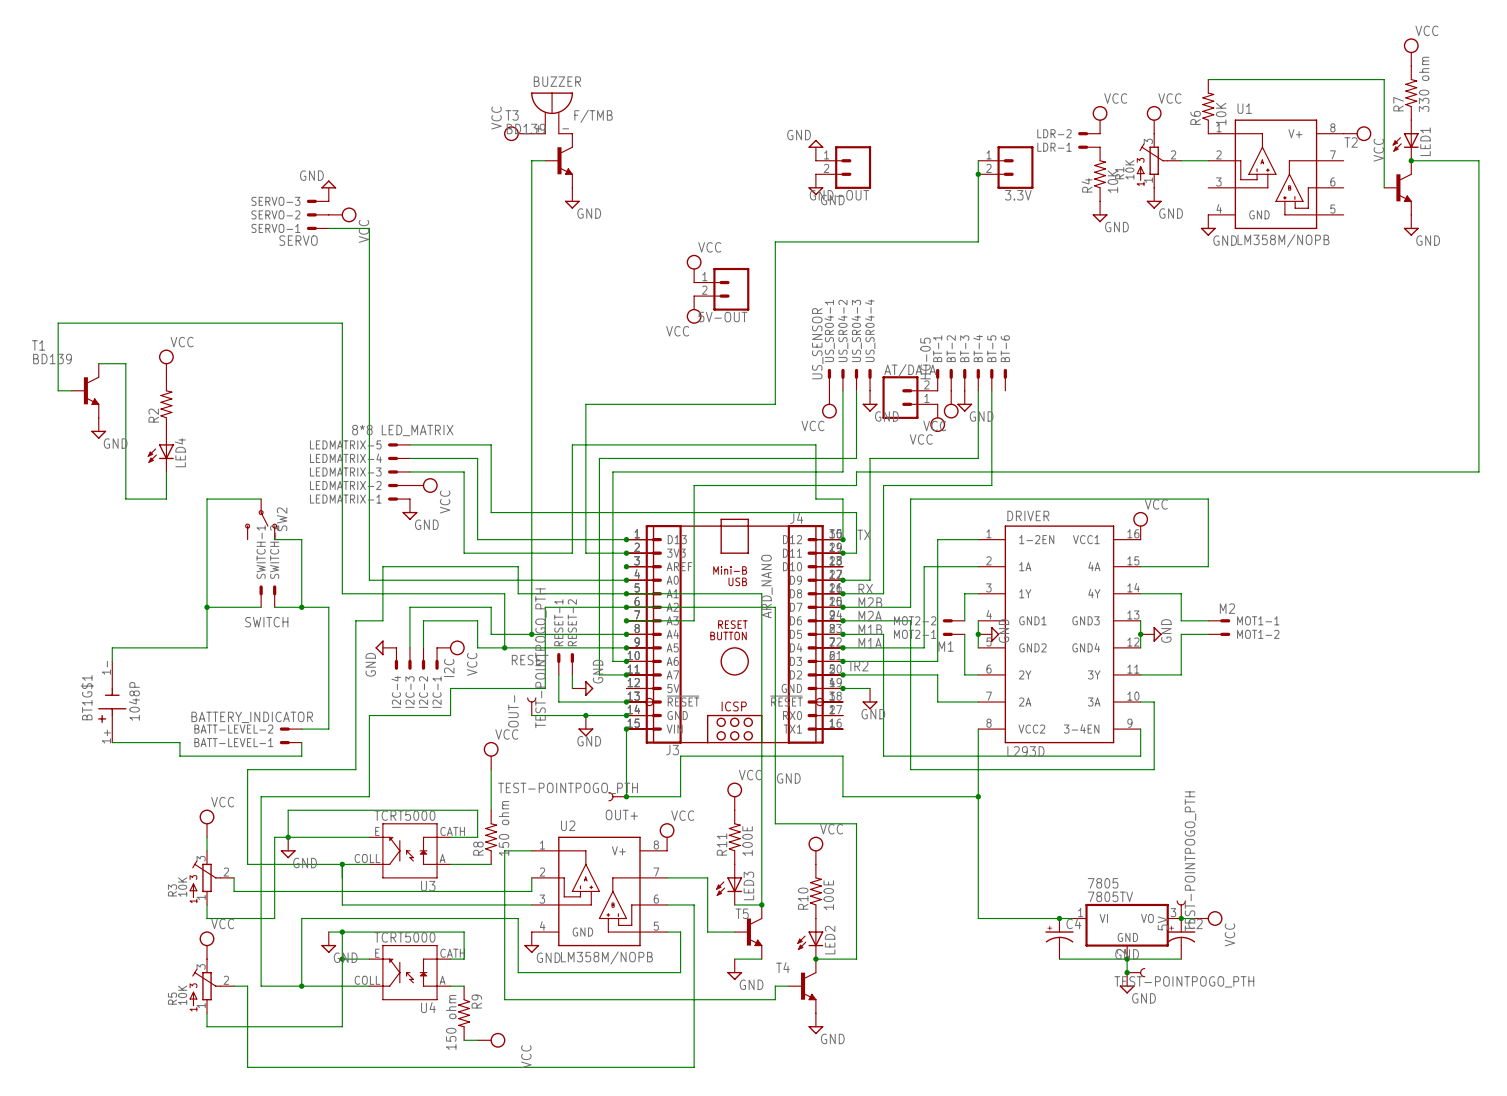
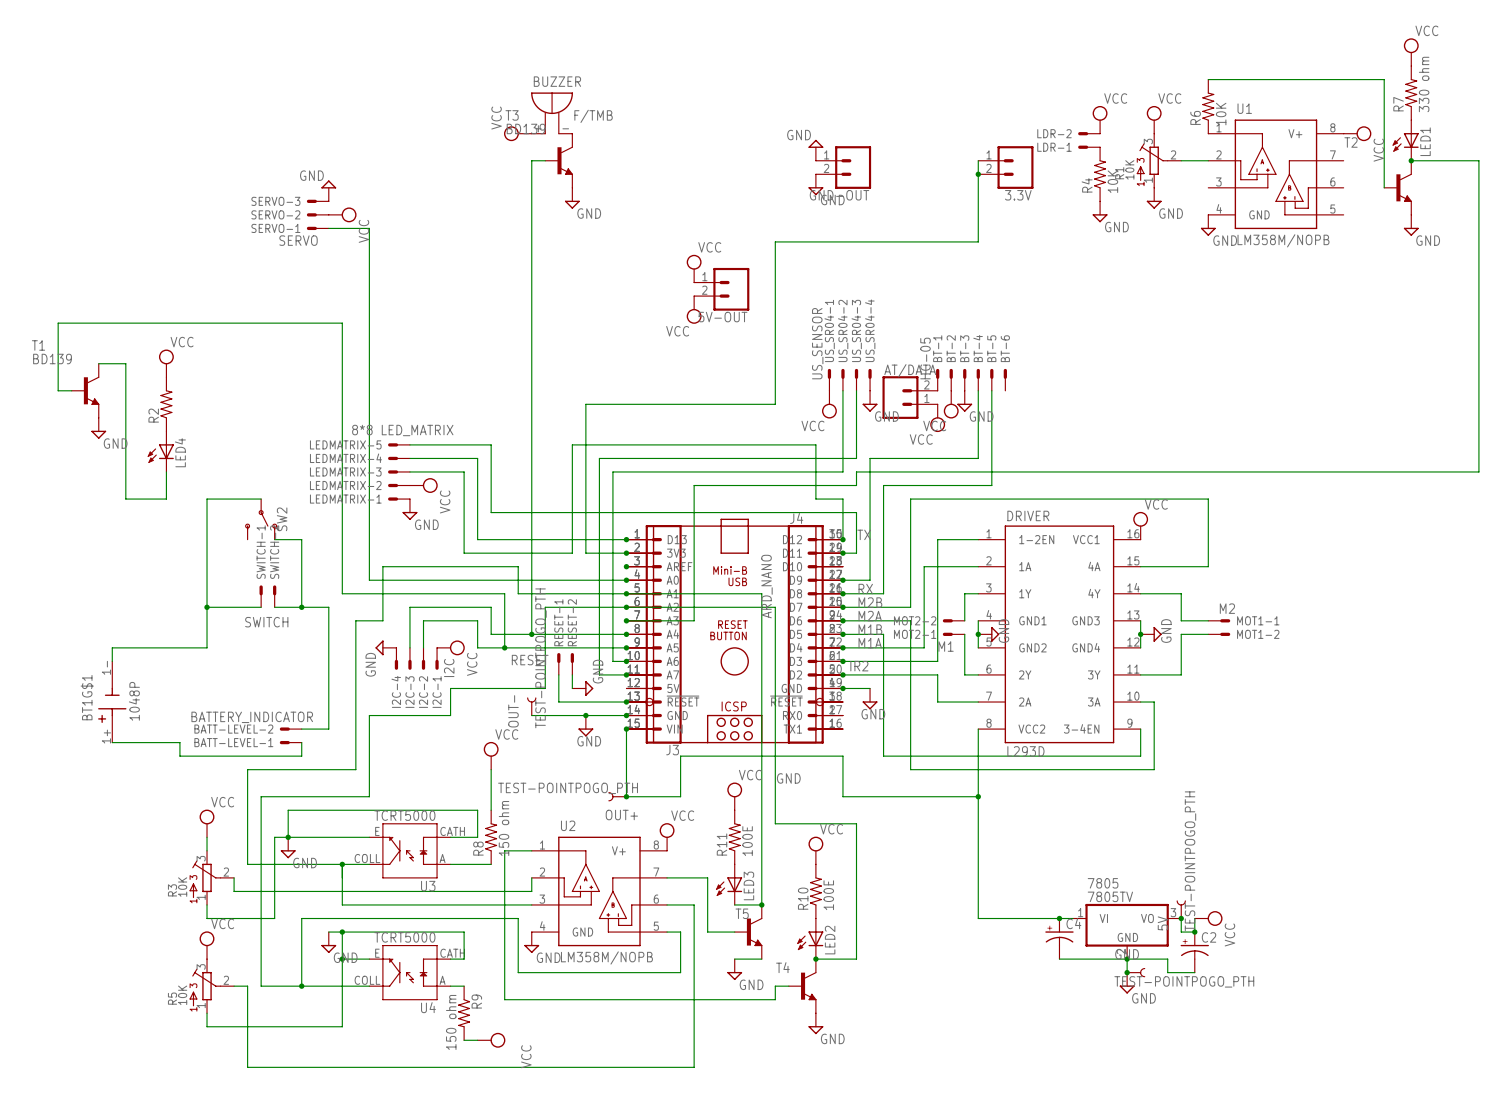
junction: none -> (1194, 932)
C2 position: (1181, 938) -> (1194, 952)
wire: (1167, 959) (1181, 959) -> (1167, 959) (1167, 972) (1194, 972)

